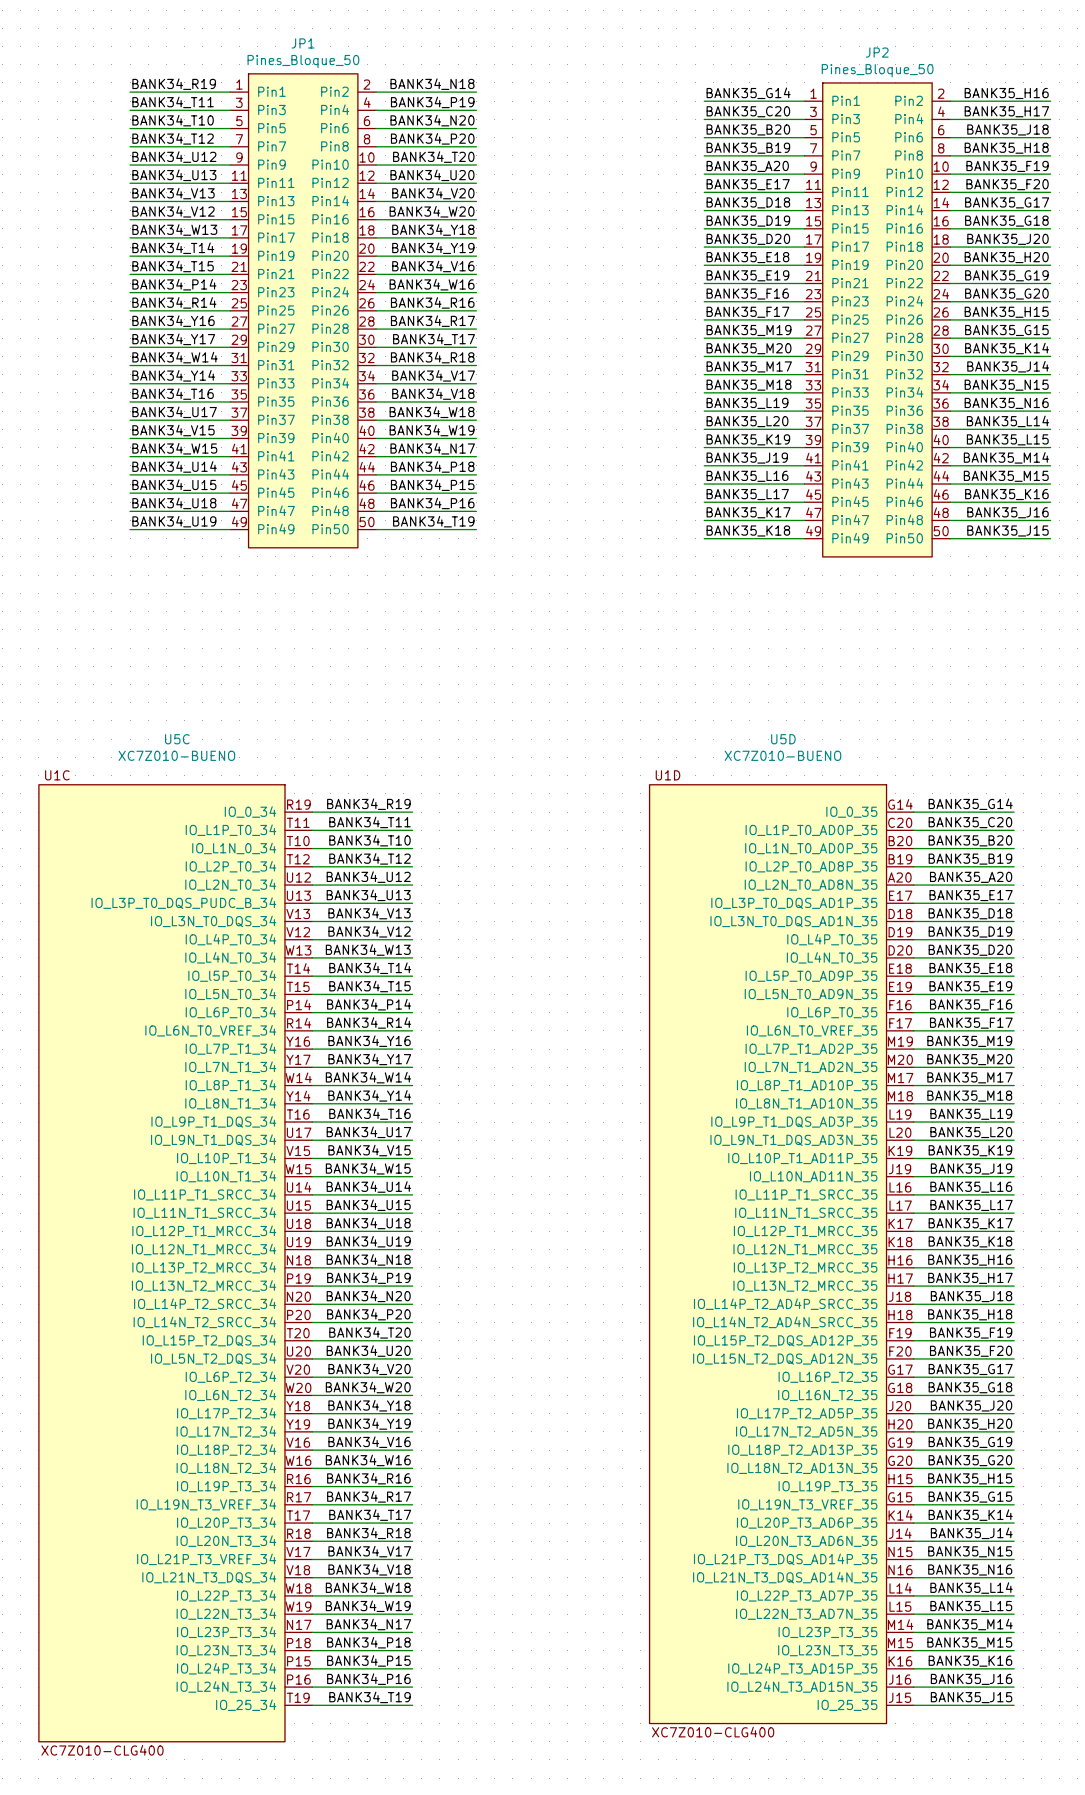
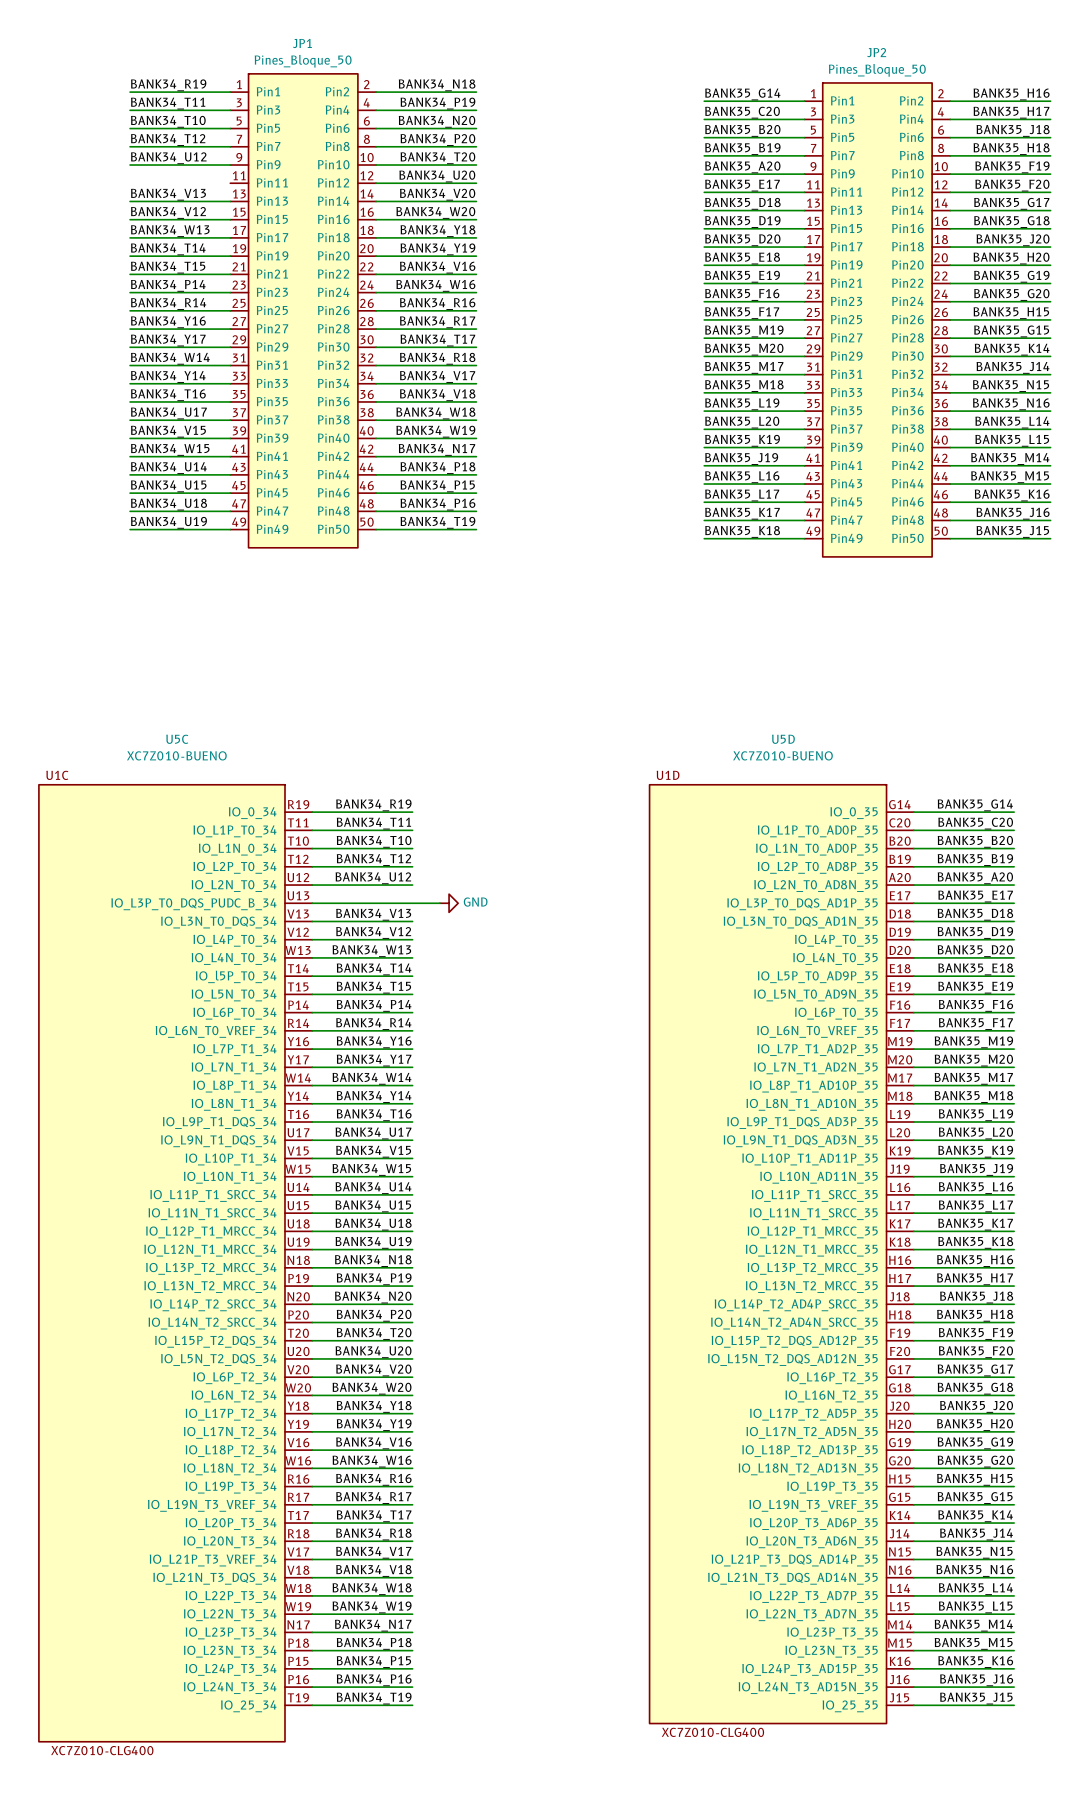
label: BANK34_U13 (174, 175) -> none
wire: (130, 183) (230, 183) -> none
label: BANK34_U13 (368, 895) -> none
wire: none -> (412, 903) (439, 903)
power symbol: none -> GND (449, 903)

